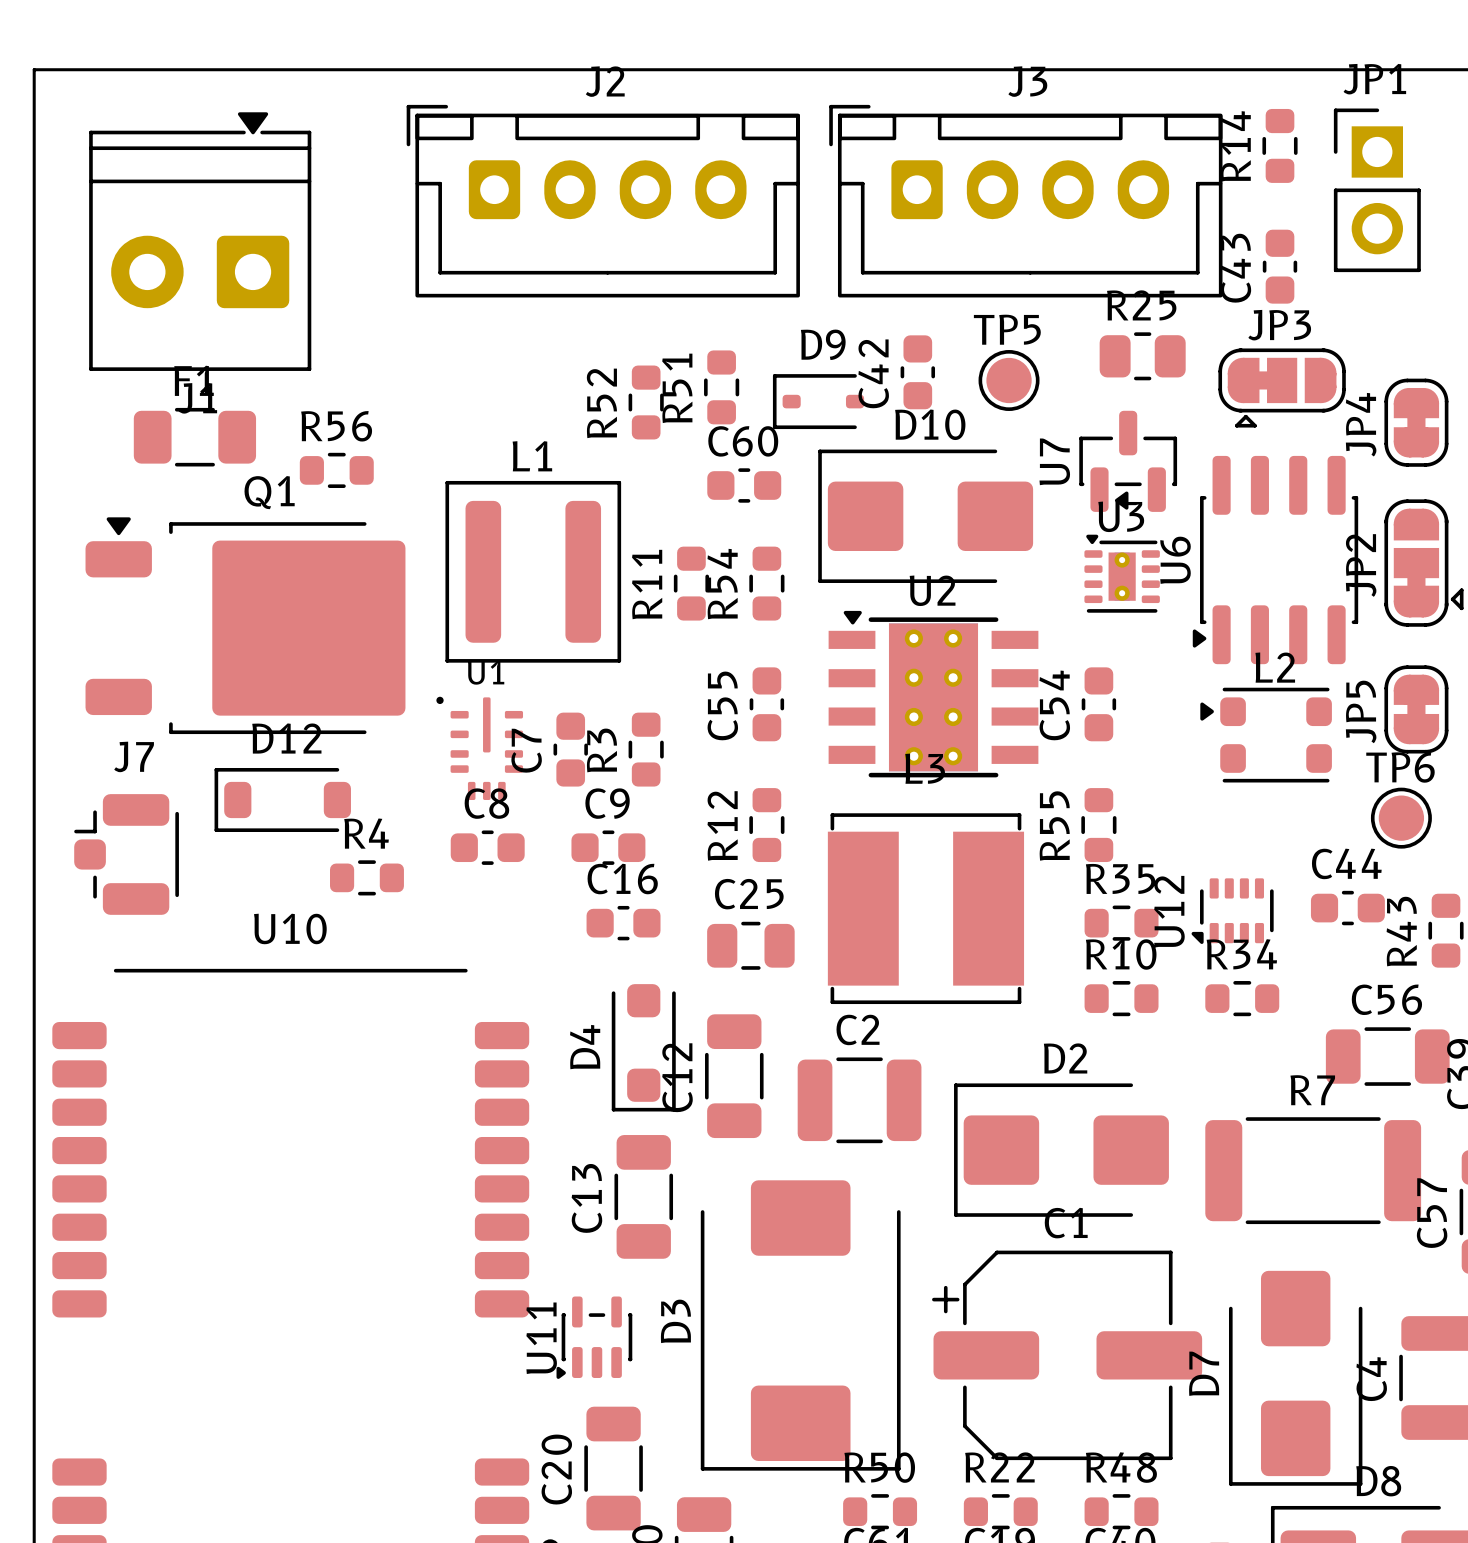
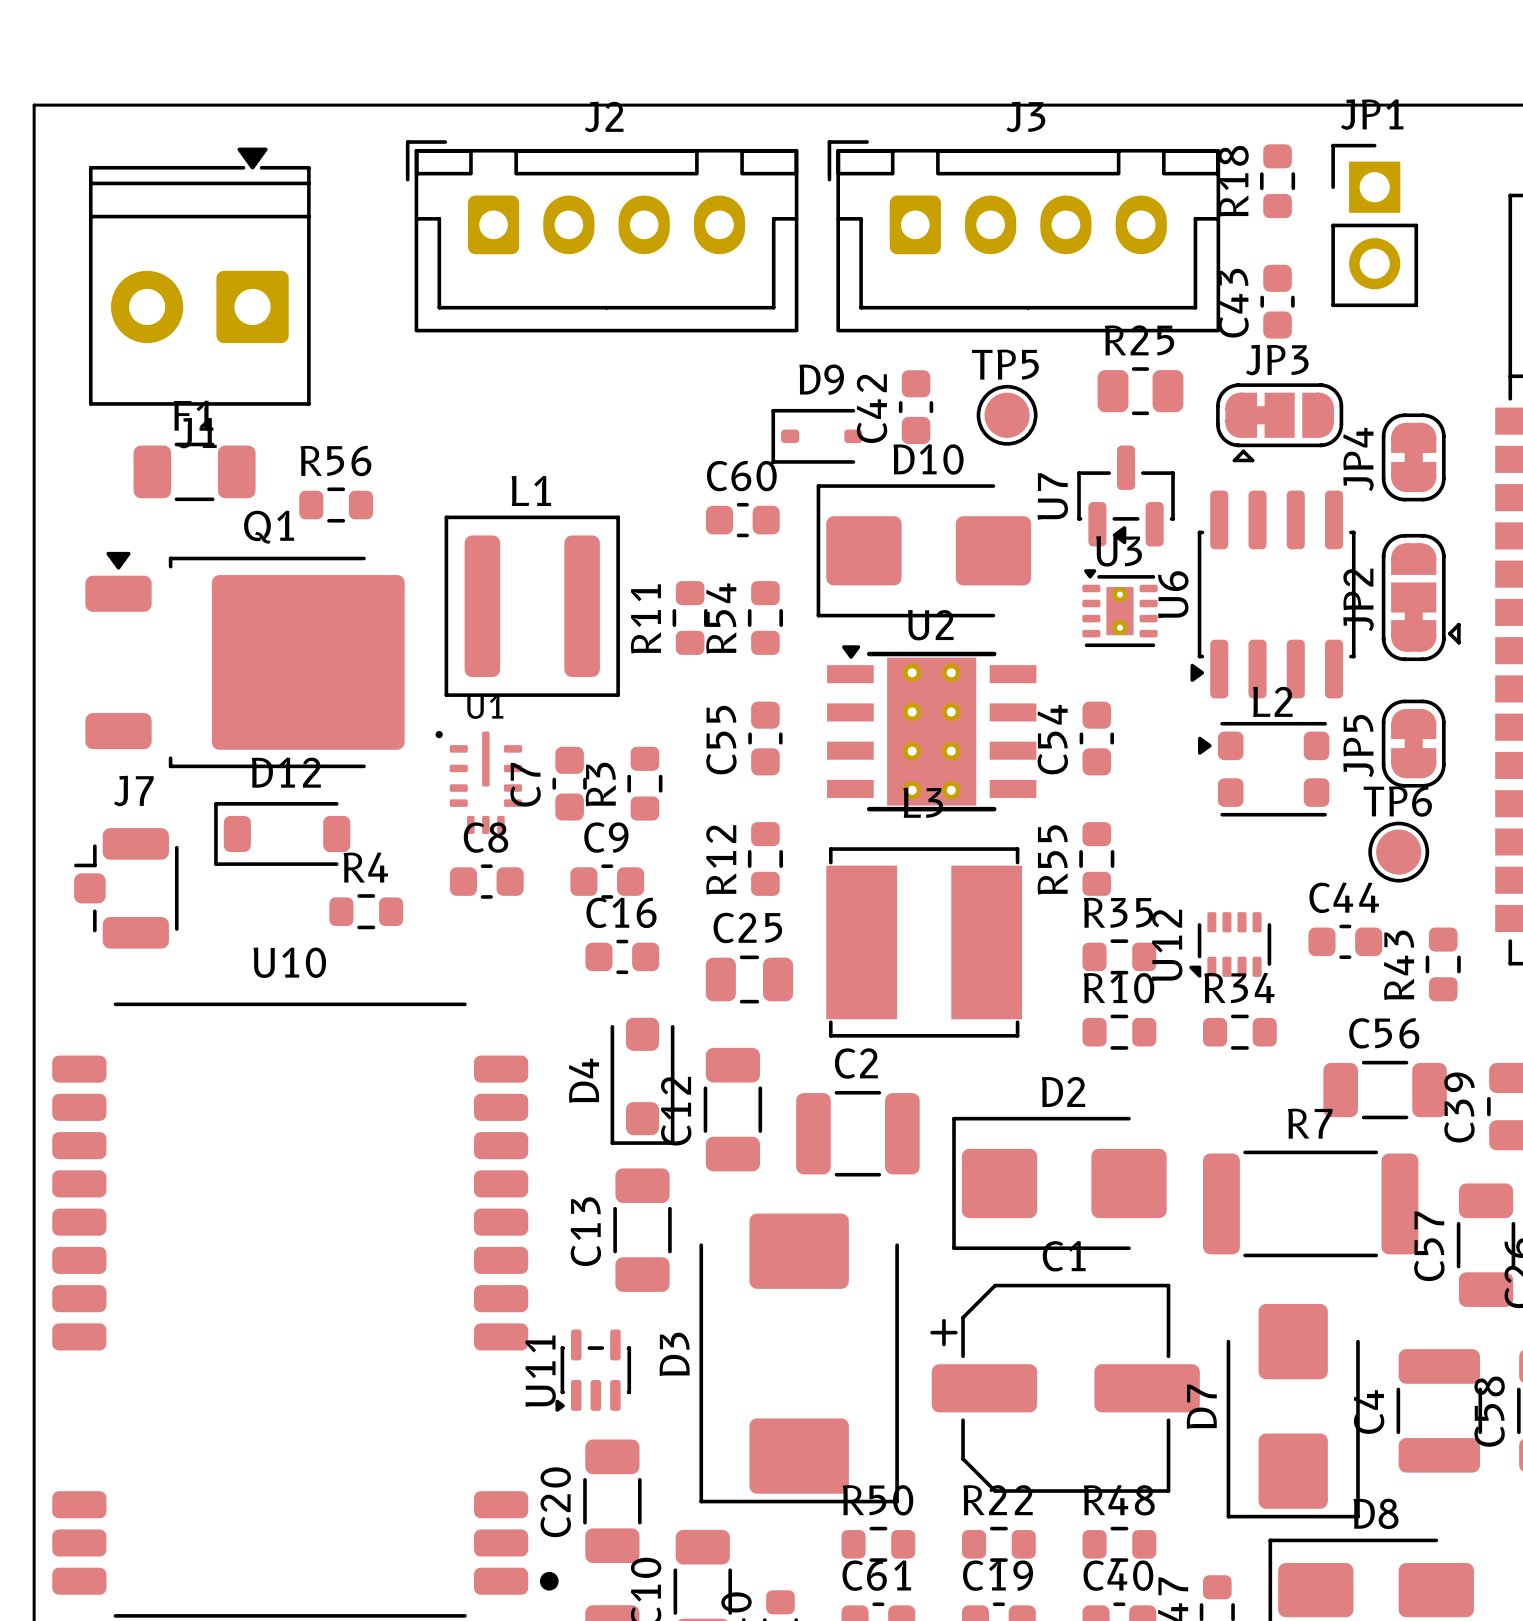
R14 name: R14 (1235, 146) -> R18 (1233, 181)
R51: (721, 387) -> none
R52: (646, 402) -> none

